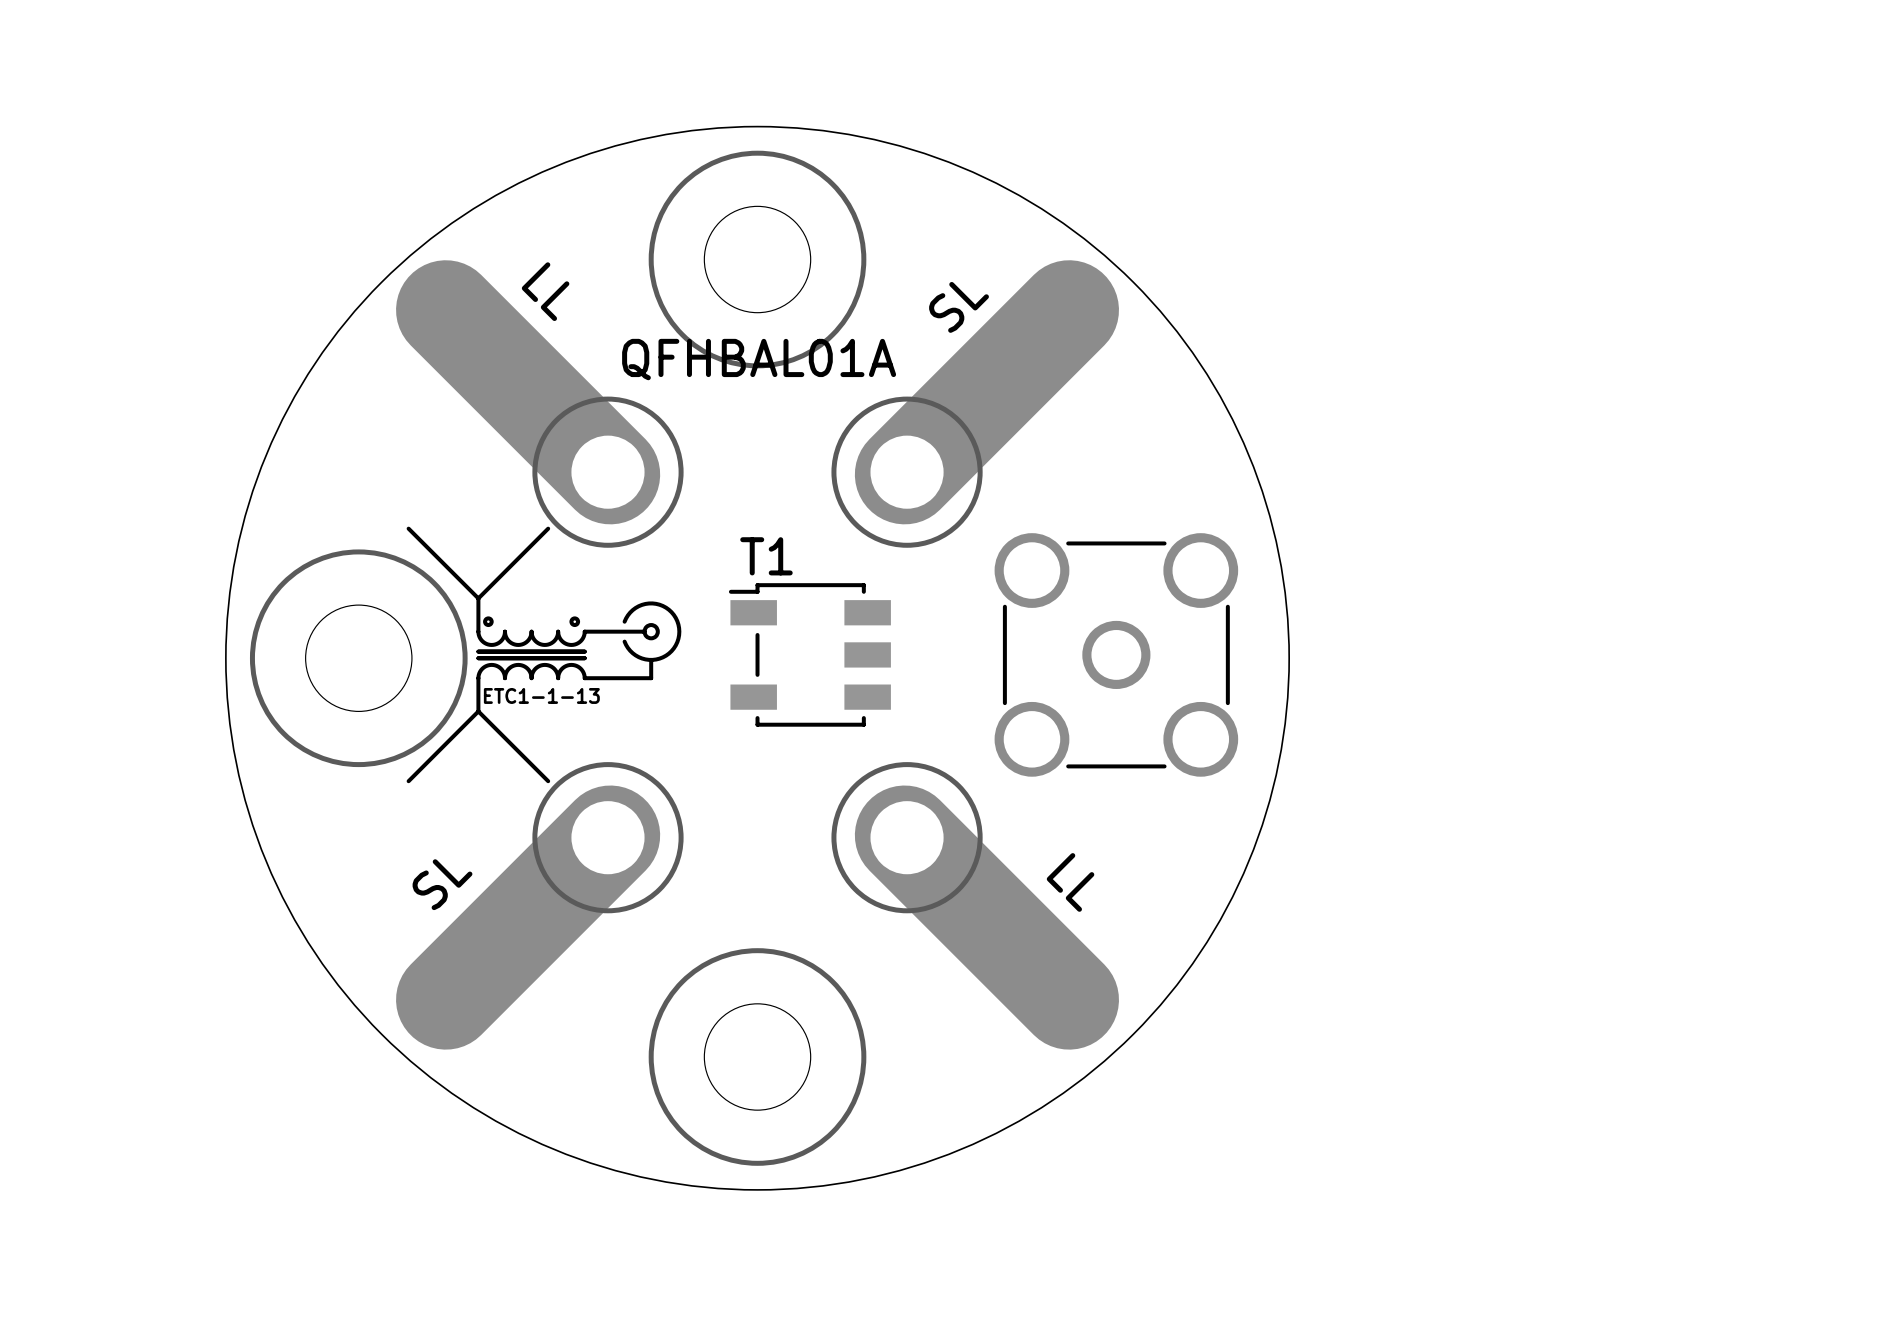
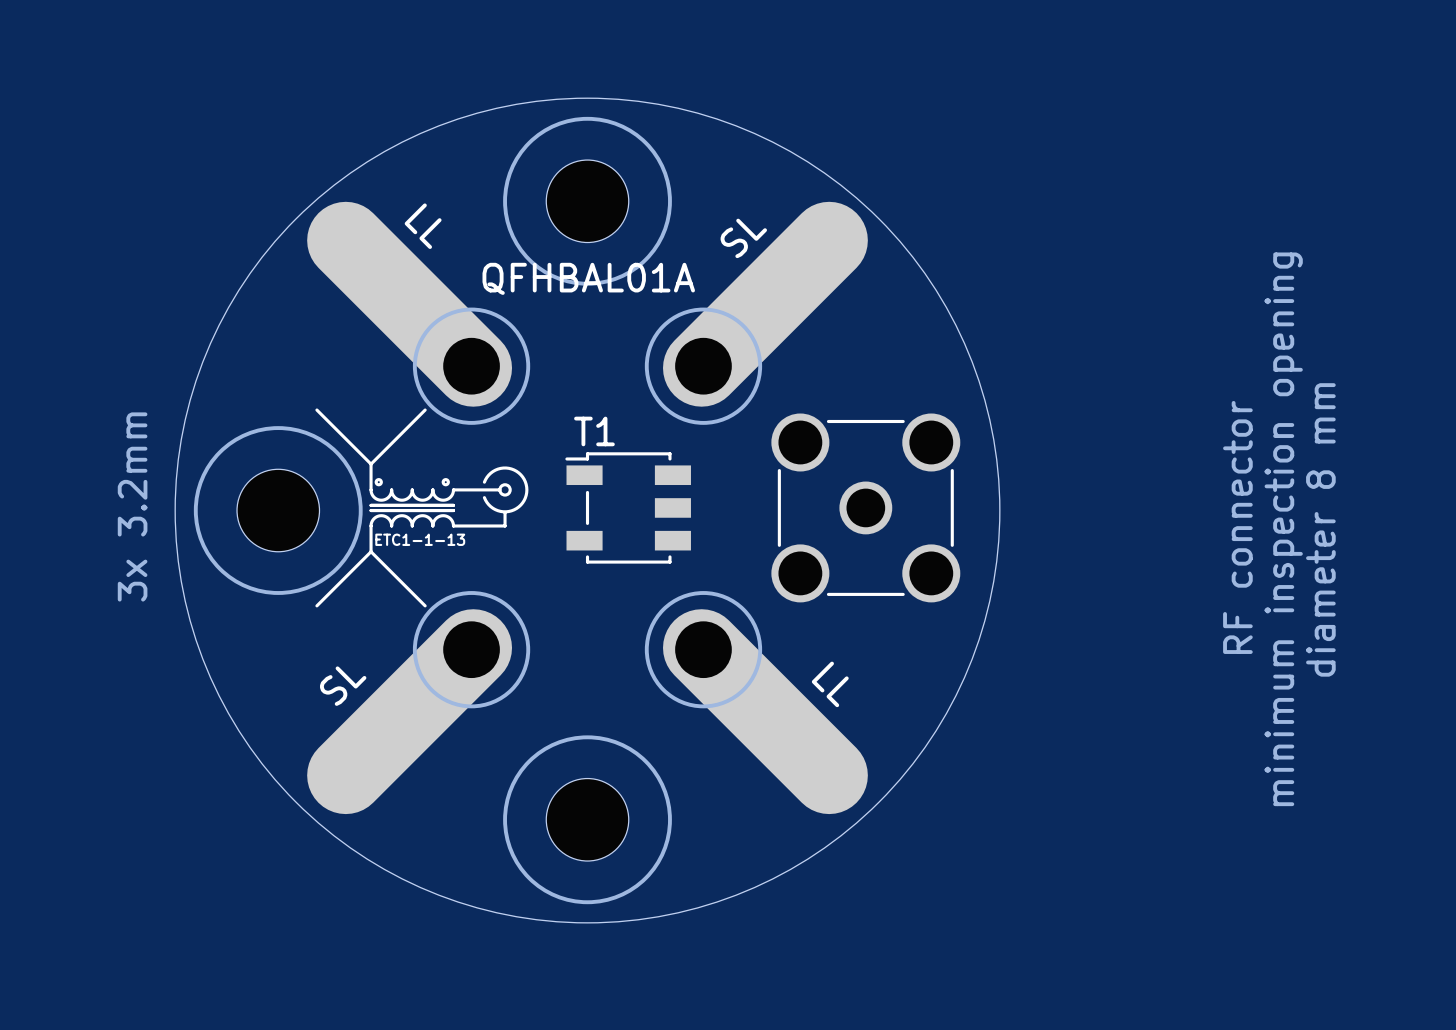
text: none -> 3x 3.2mm (132, 506)
text: none -> RF connector (1237, 527)
text: none -> minimum inspection opening (1283, 529)
text: none -> diameter 8 mm (1320, 529)

